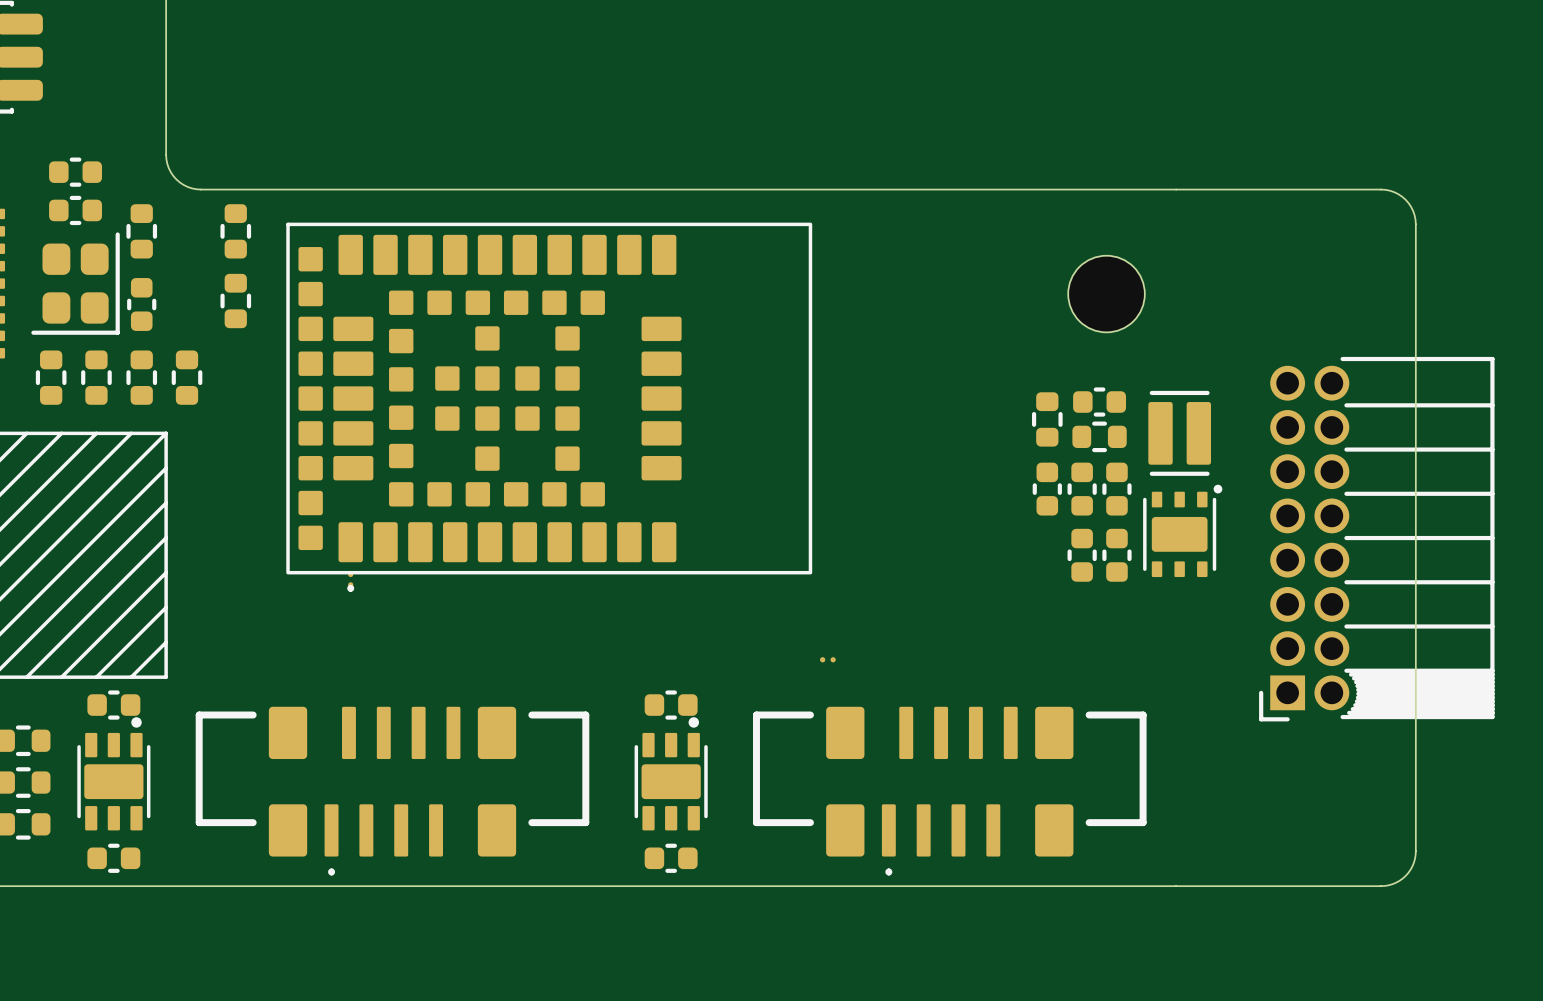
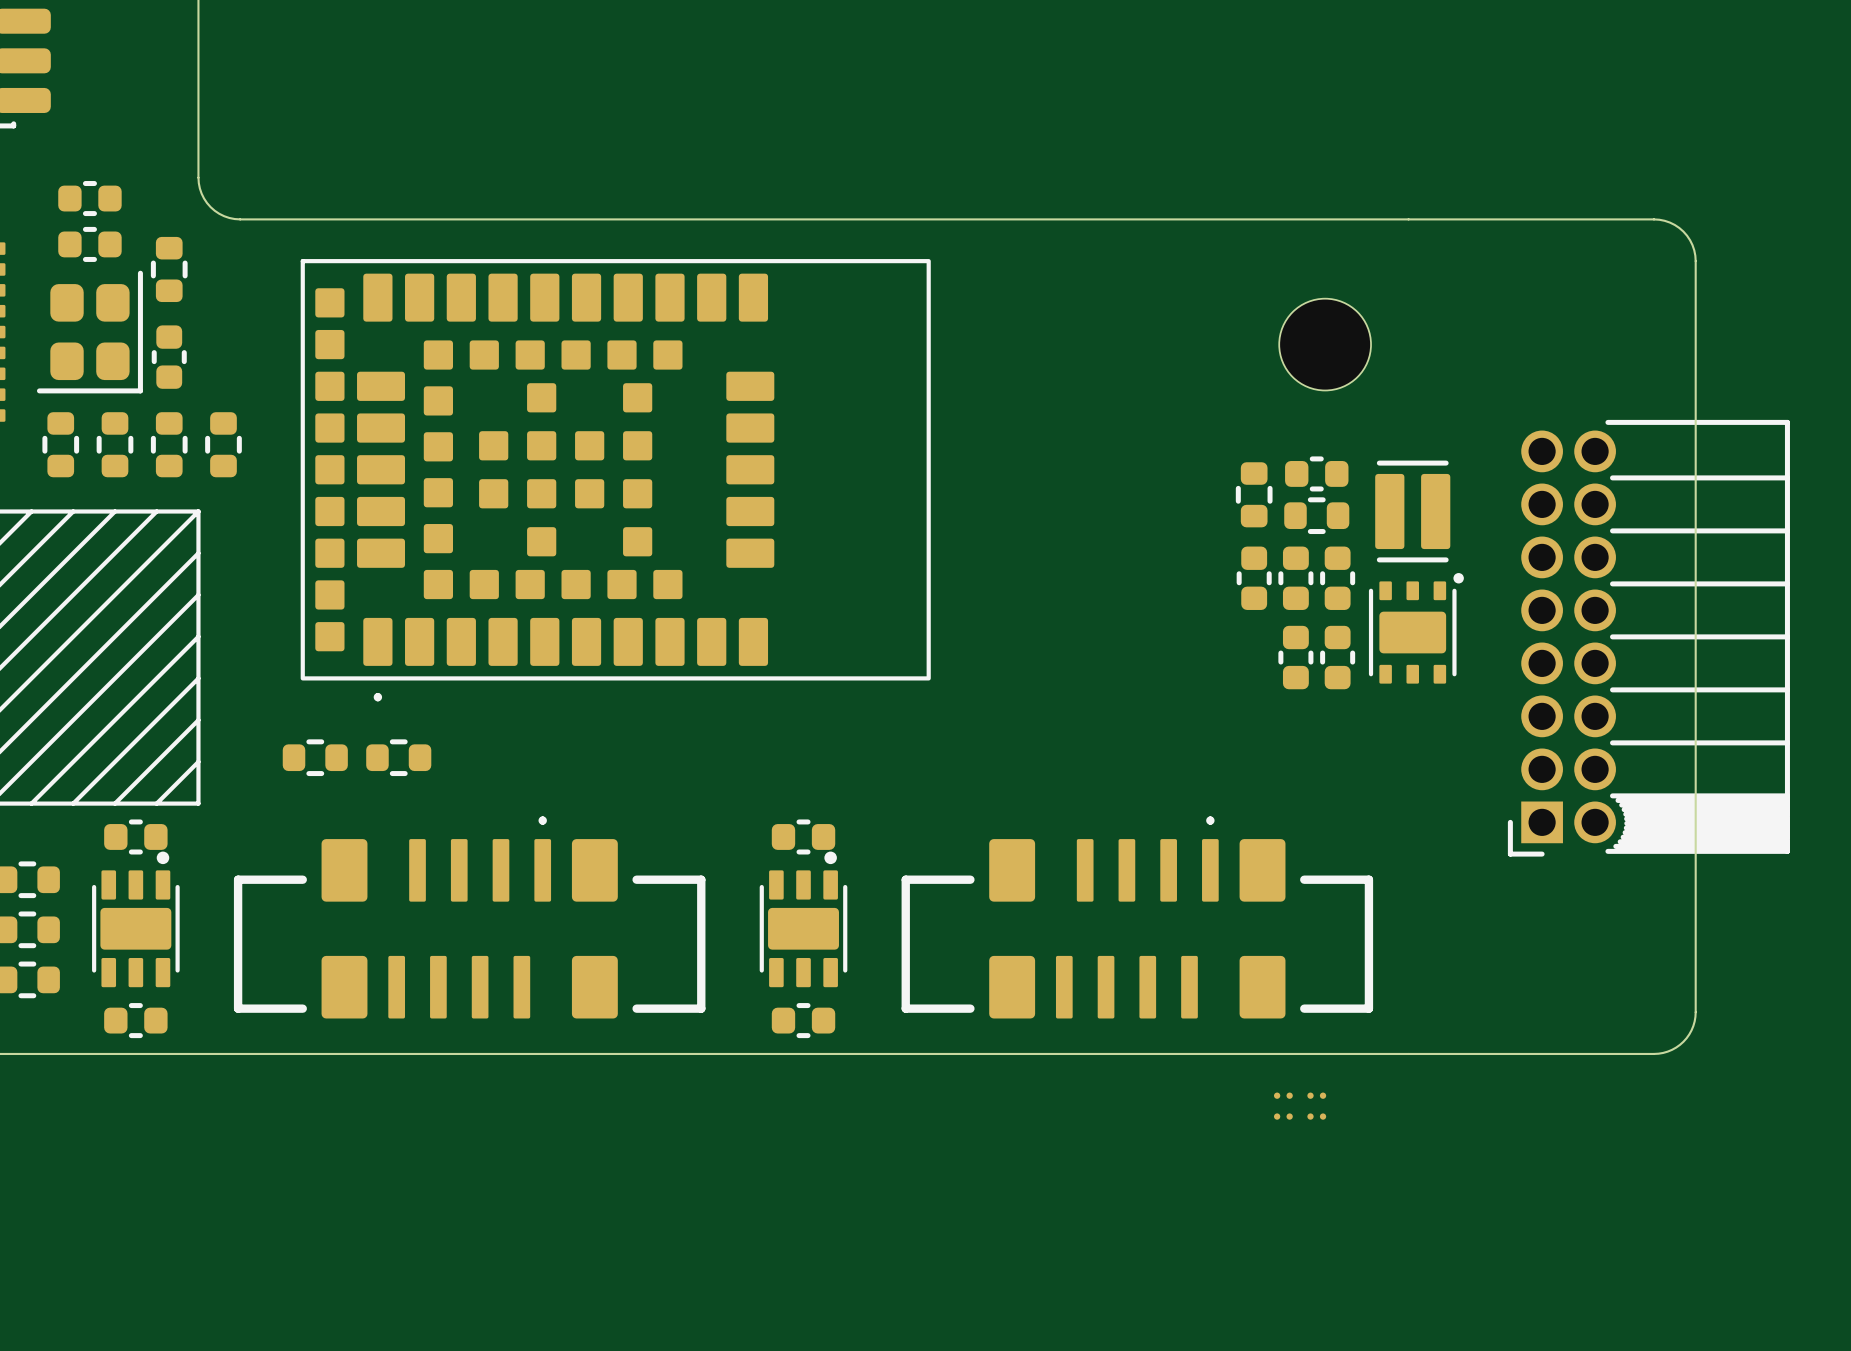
part: (235, 231) -> none
part: (235, 301) -> none
part position: (549, 407) -> (615, 480)
part: (350, 579) -> none
part: none -> (315, 757)
part: none -> (398, 757)
part: (827, 659) -> none
part rotation: 0° (392, 791) -> 180° (469, 917)
part rotation: 0° (949, 791) -> 180° (1137, 917)
part: none -> (1283, 1095)
part: none -> (1316, 1095)
part: none -> (1283, 1116)
part: none -> (1316, 1116)

